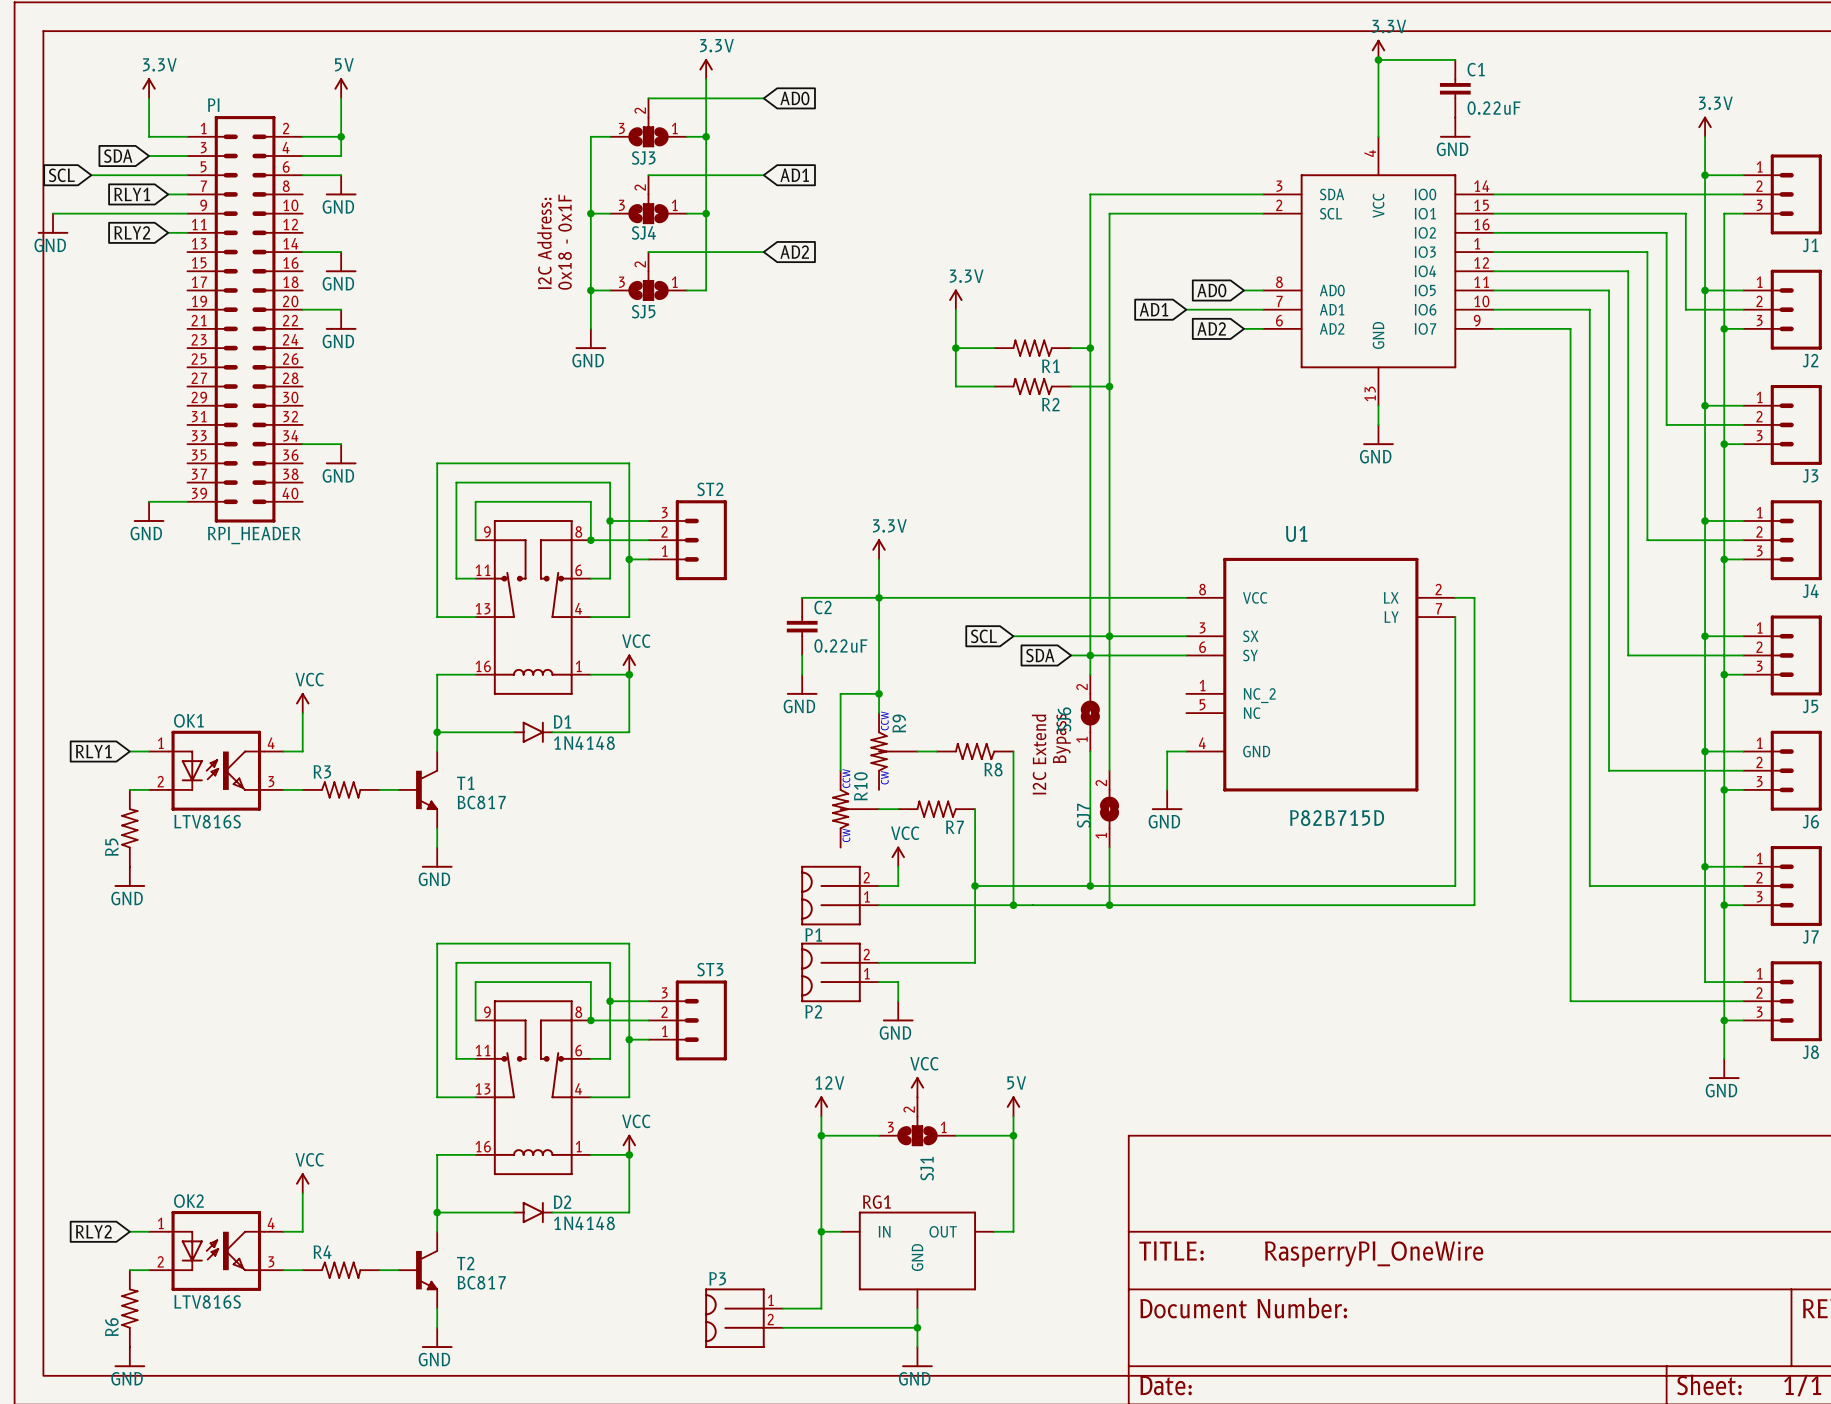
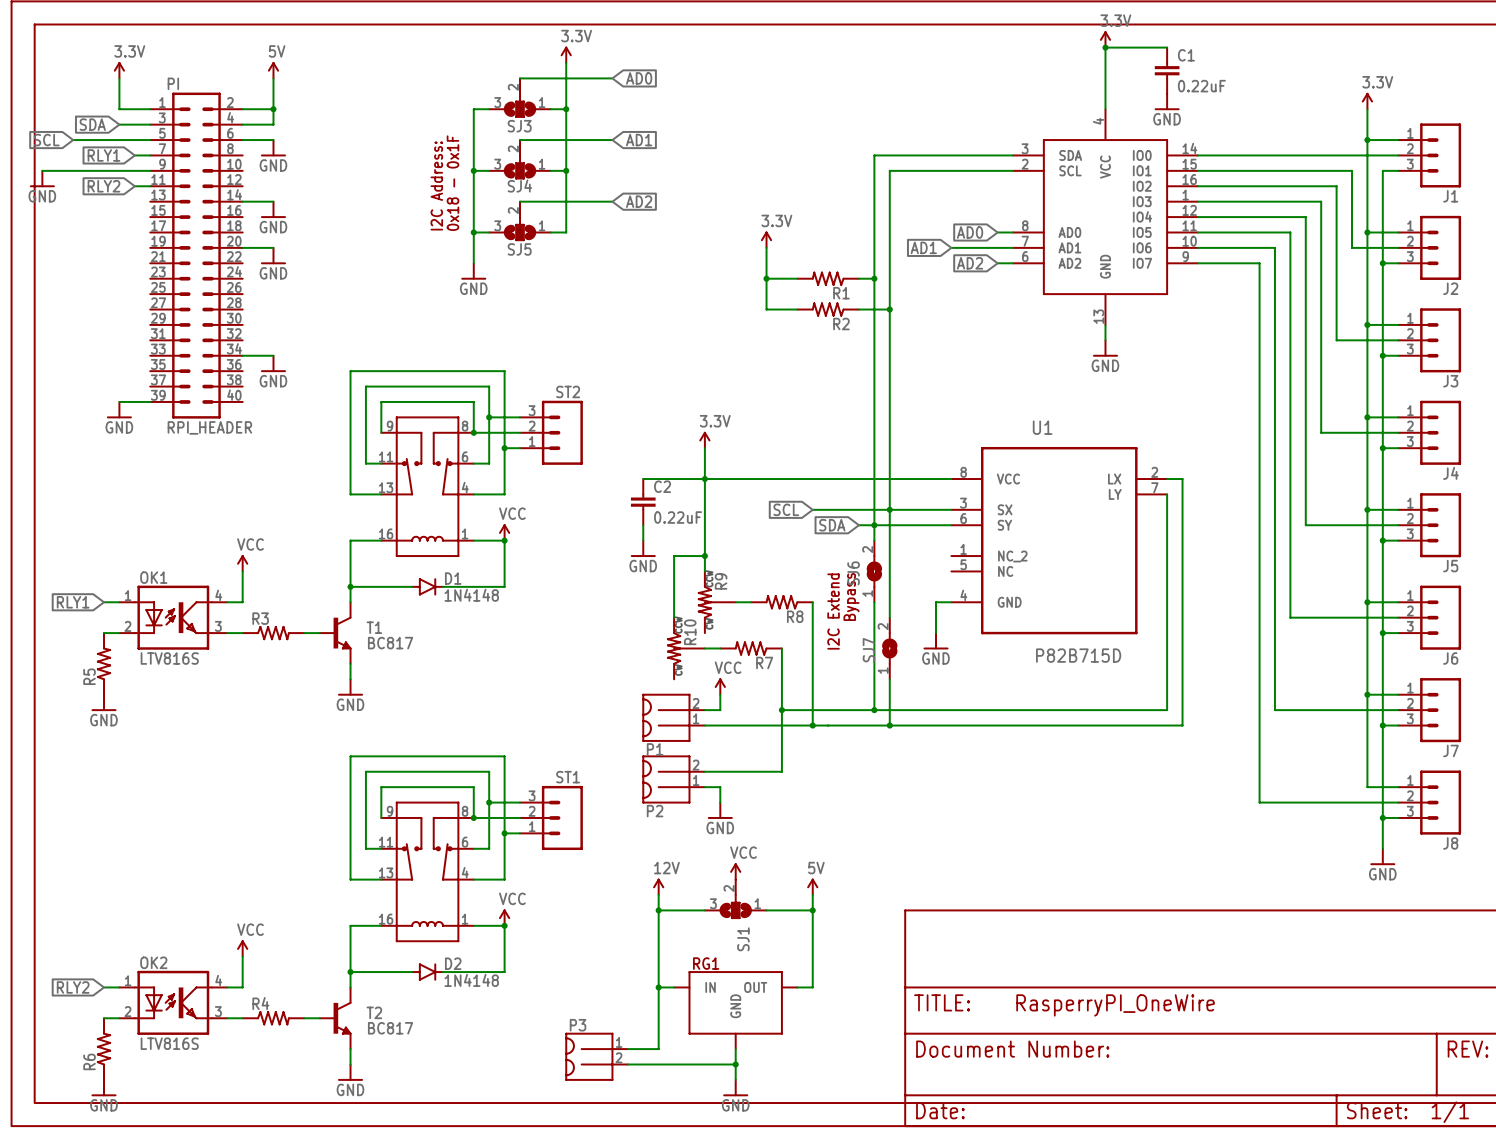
ST3 name: ST3 (710, 969) -> ST1 (568, 777)

